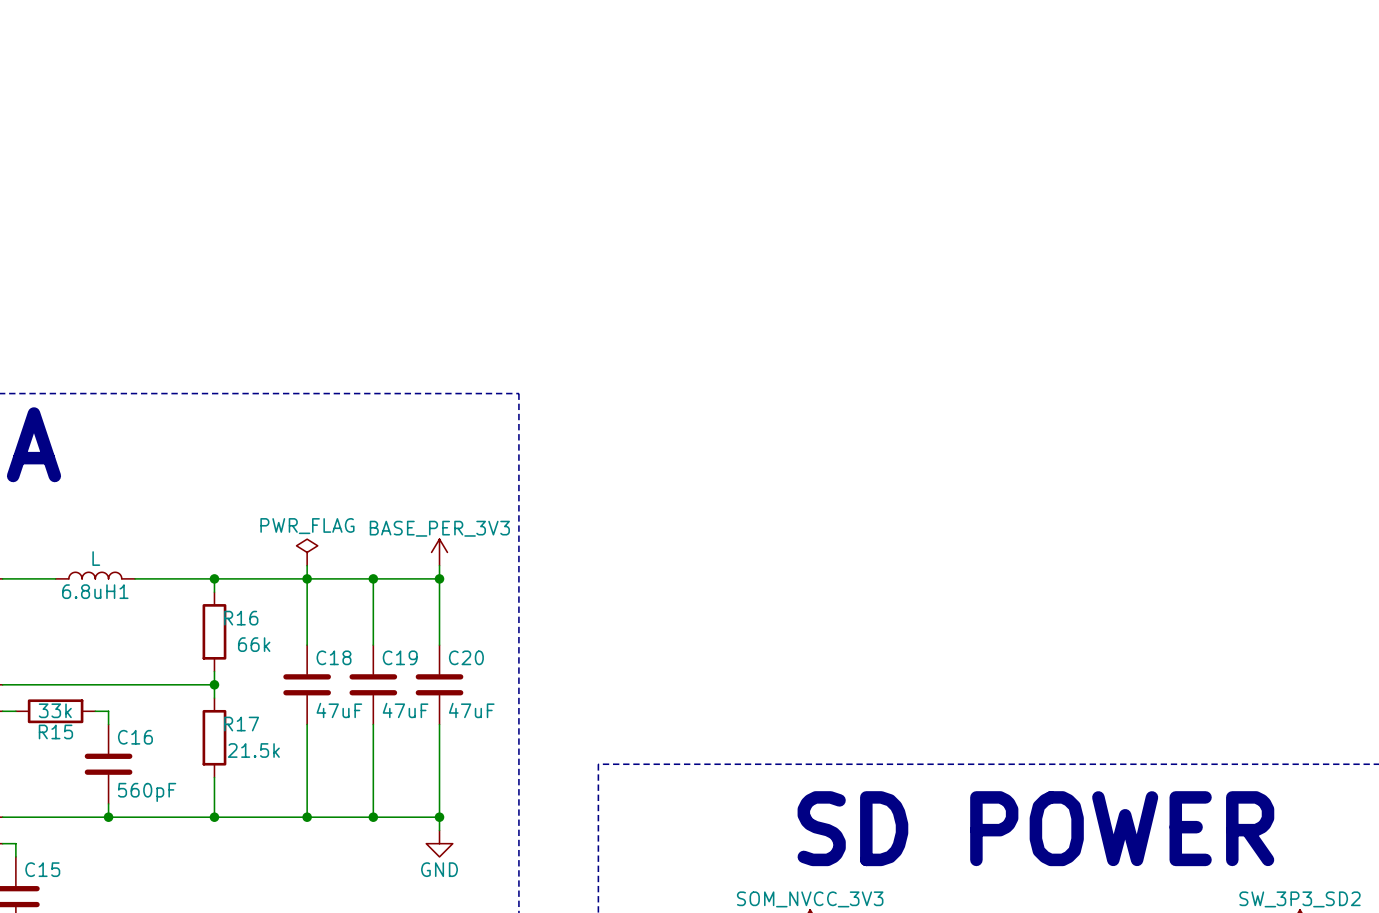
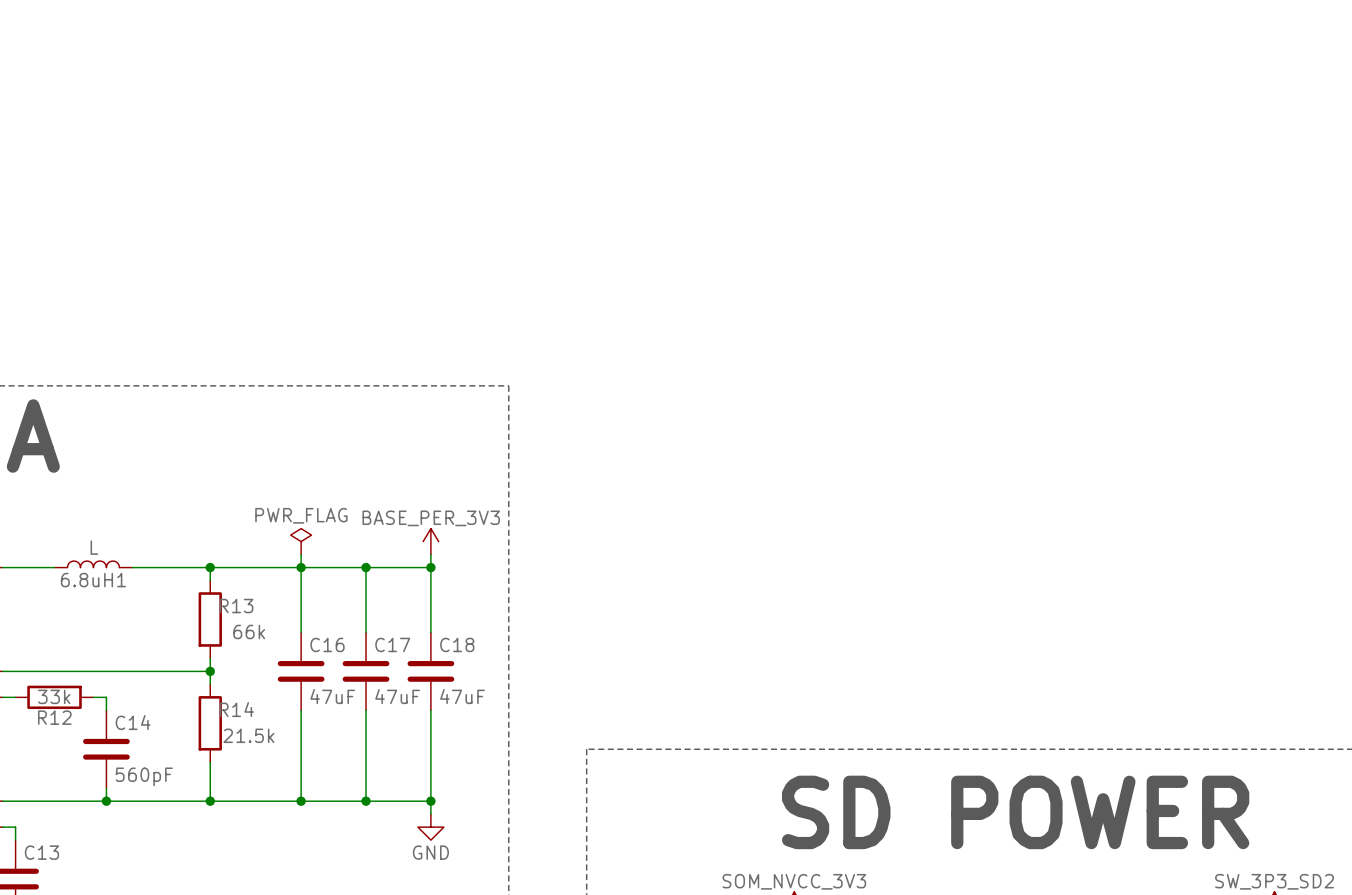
R16 name: R16 (241, 618) -> R13 (236, 606)
C18 name: C18 (334, 657) -> C16 (327, 644)
C19 name: C19 (400, 657) -> C17 (392, 644)
C20 name: C20 (466, 657) -> C18 (457, 644)
R17 name: R17 (241, 724) -> R14 (236, 709)
R15 name: R15 (55, 731) -> R12 (54, 717)
C16 name: C16 (135, 737) -> C14 (133, 722)
C15 name: C15 (42, 869) -> C13 (41, 852)

